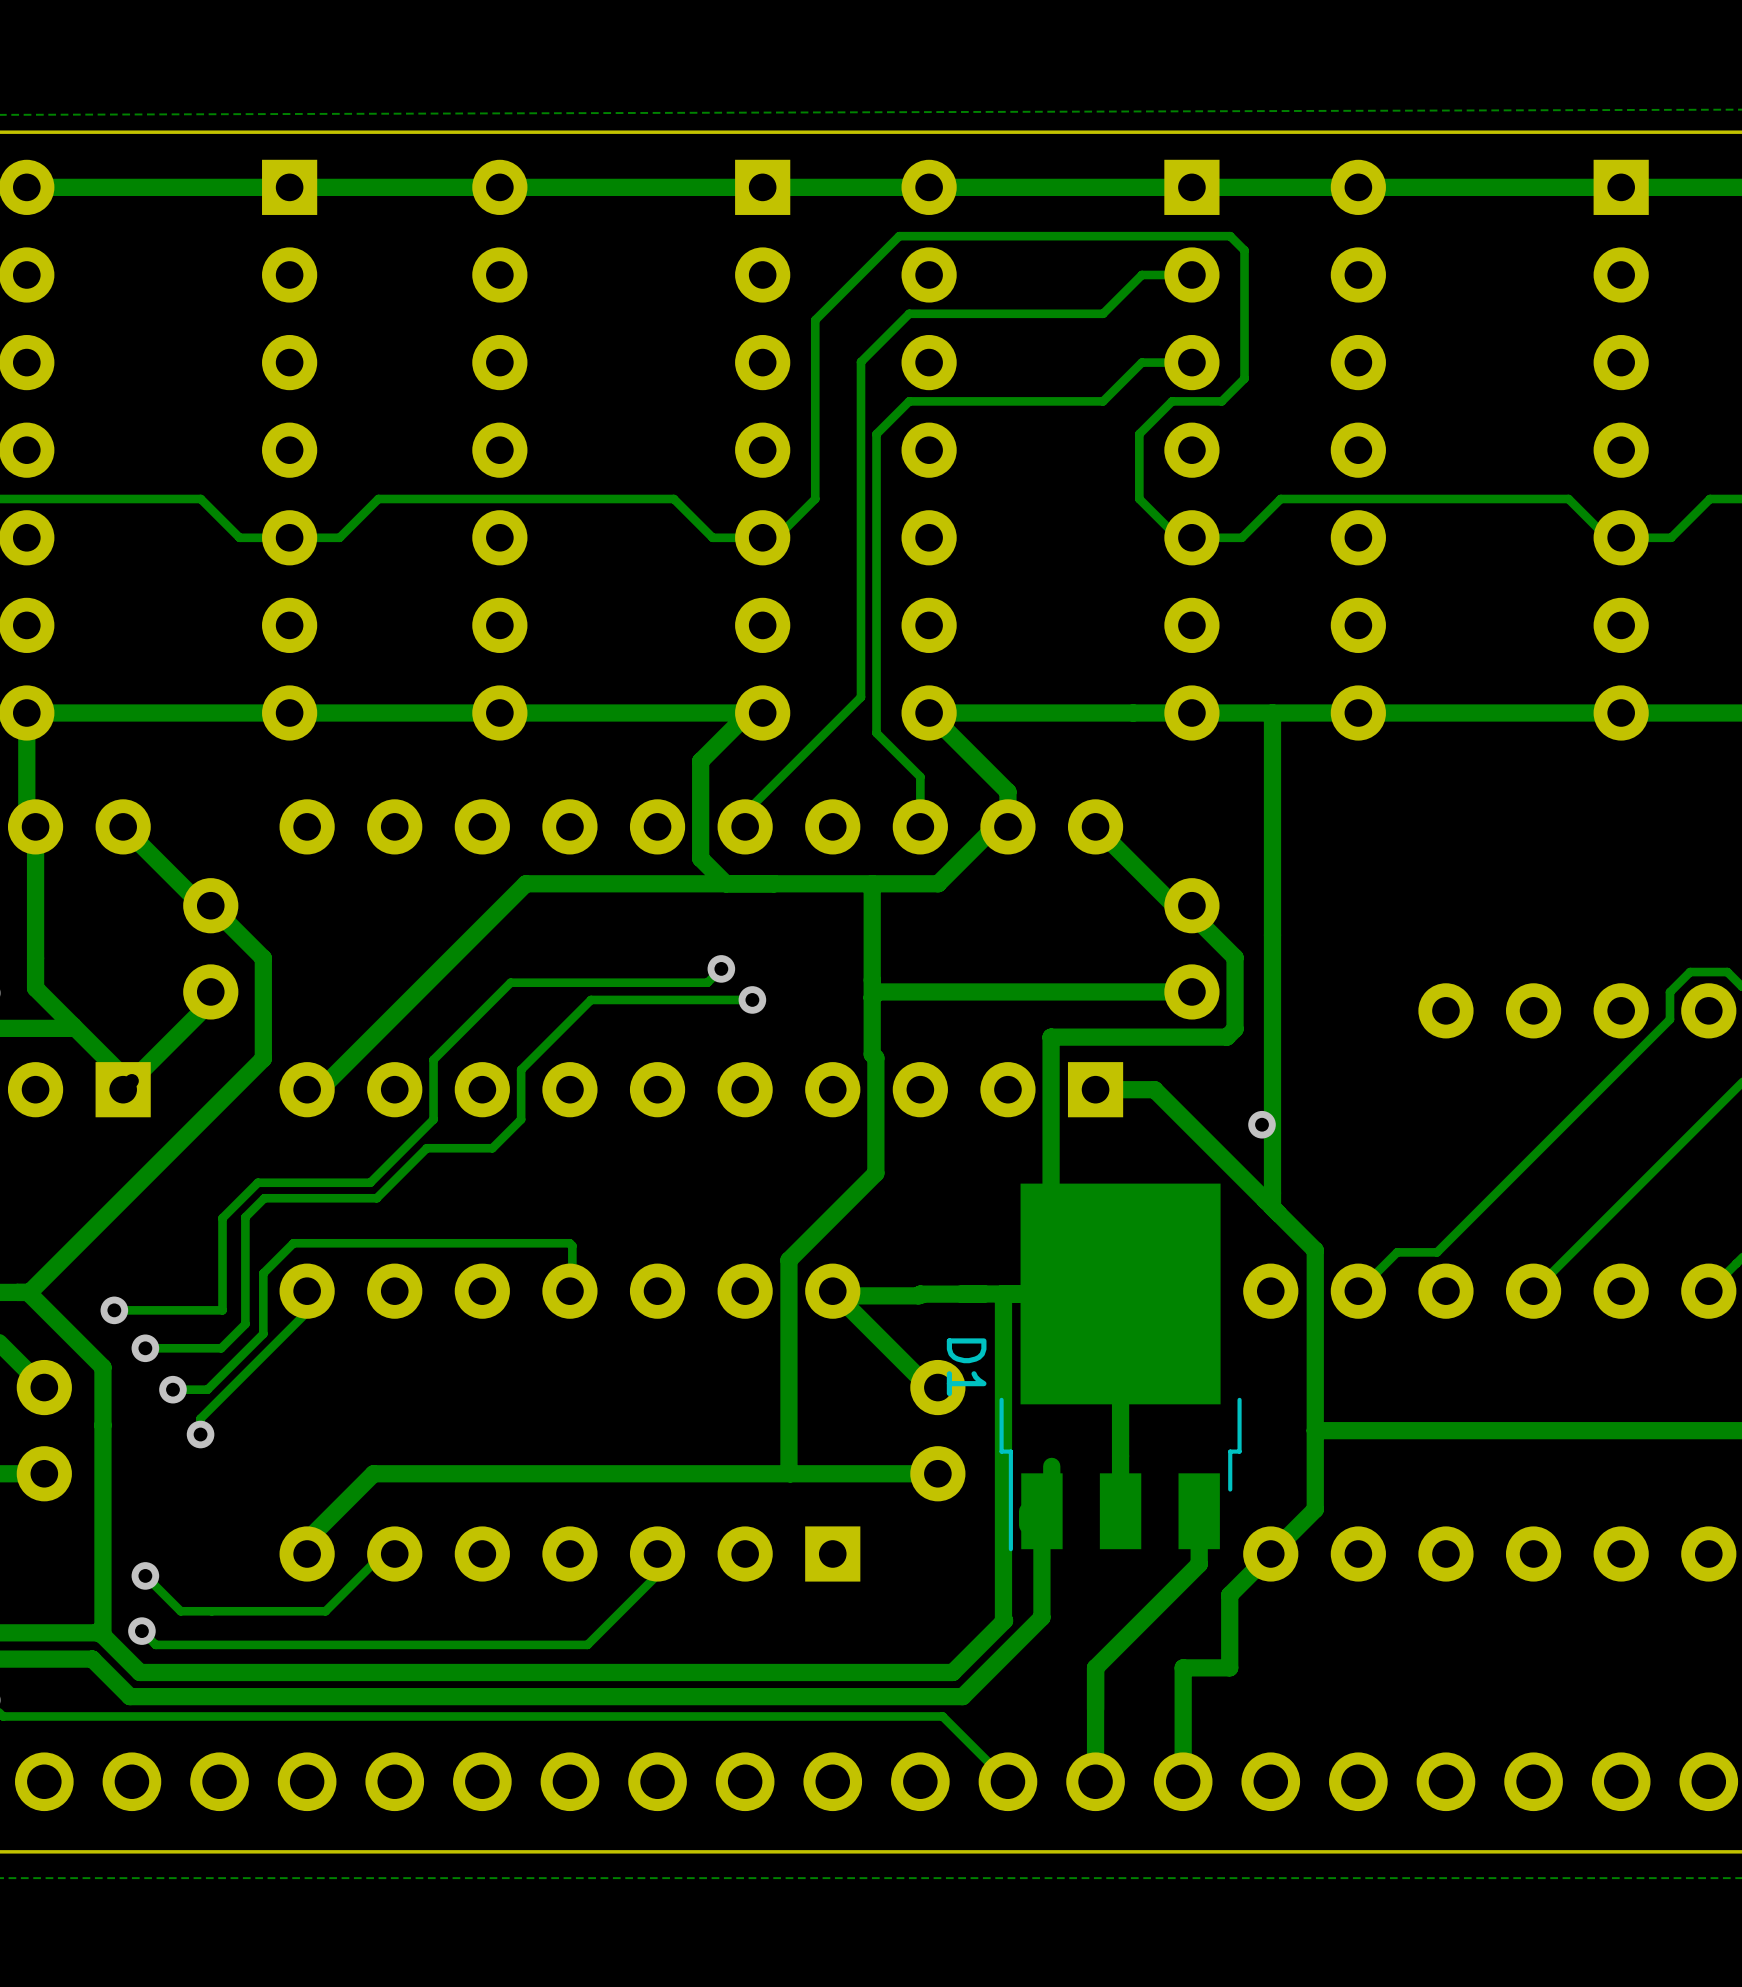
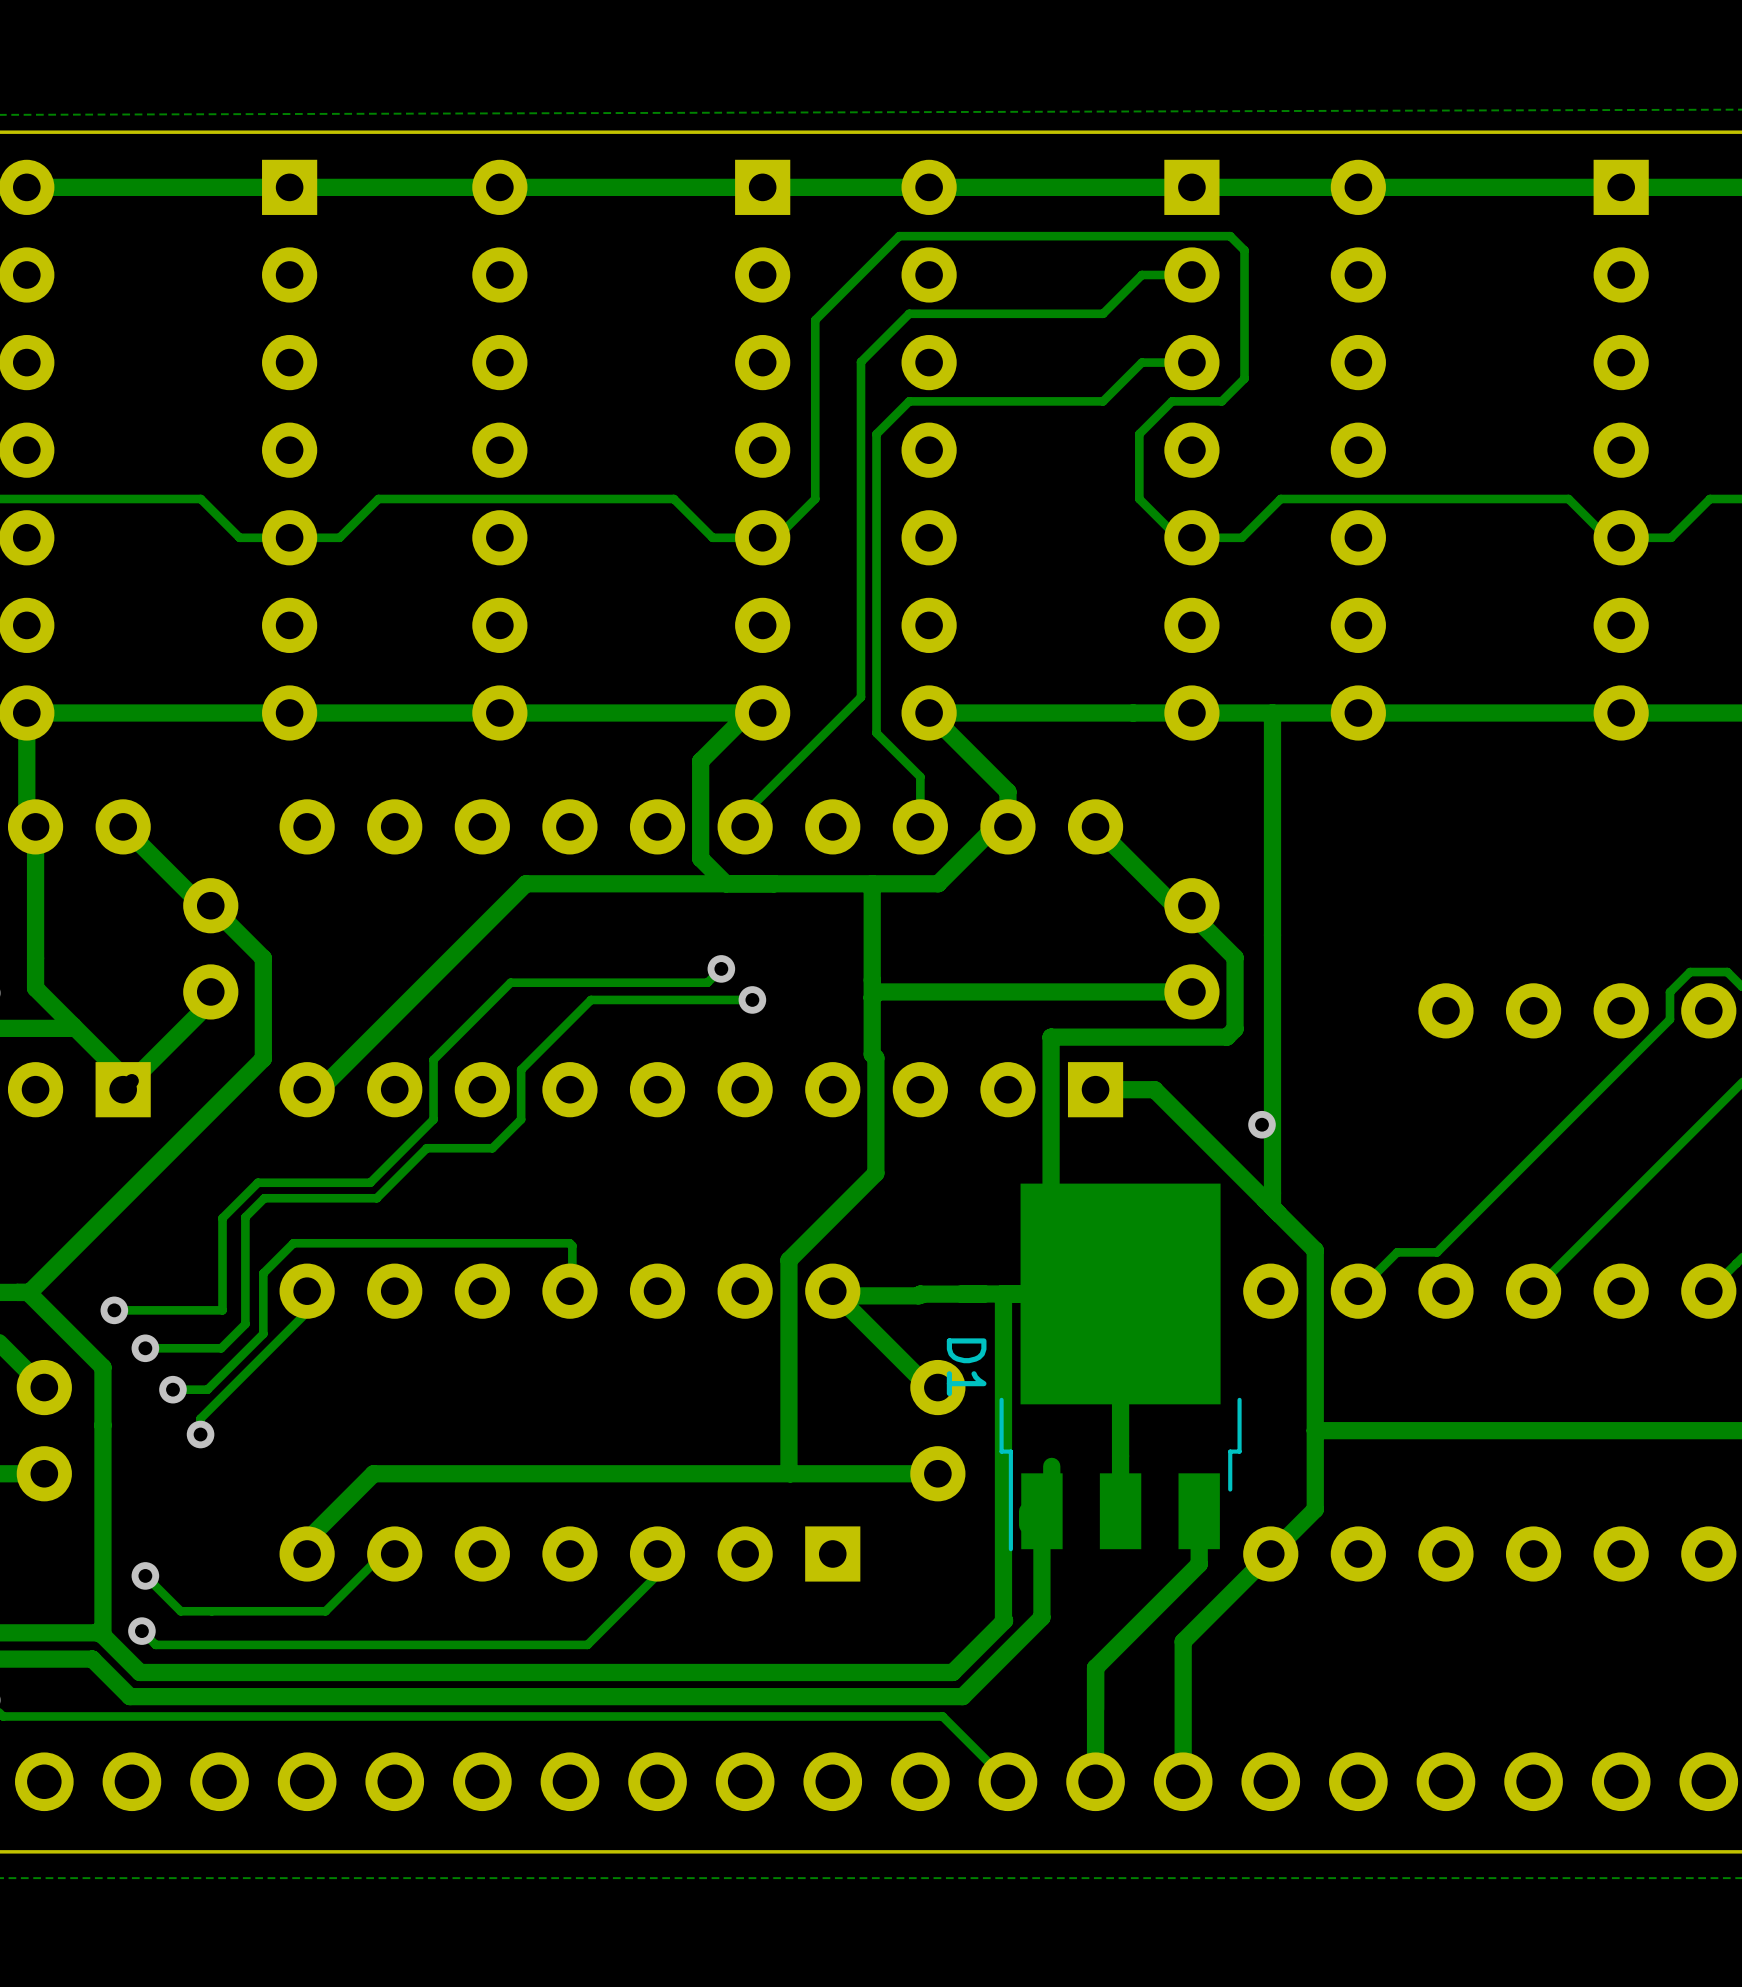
track: (1229, 1595) (1229, 1667) (1183, 1667) -> (1229, 1595) (1183, 1641) (1183, 1667)

